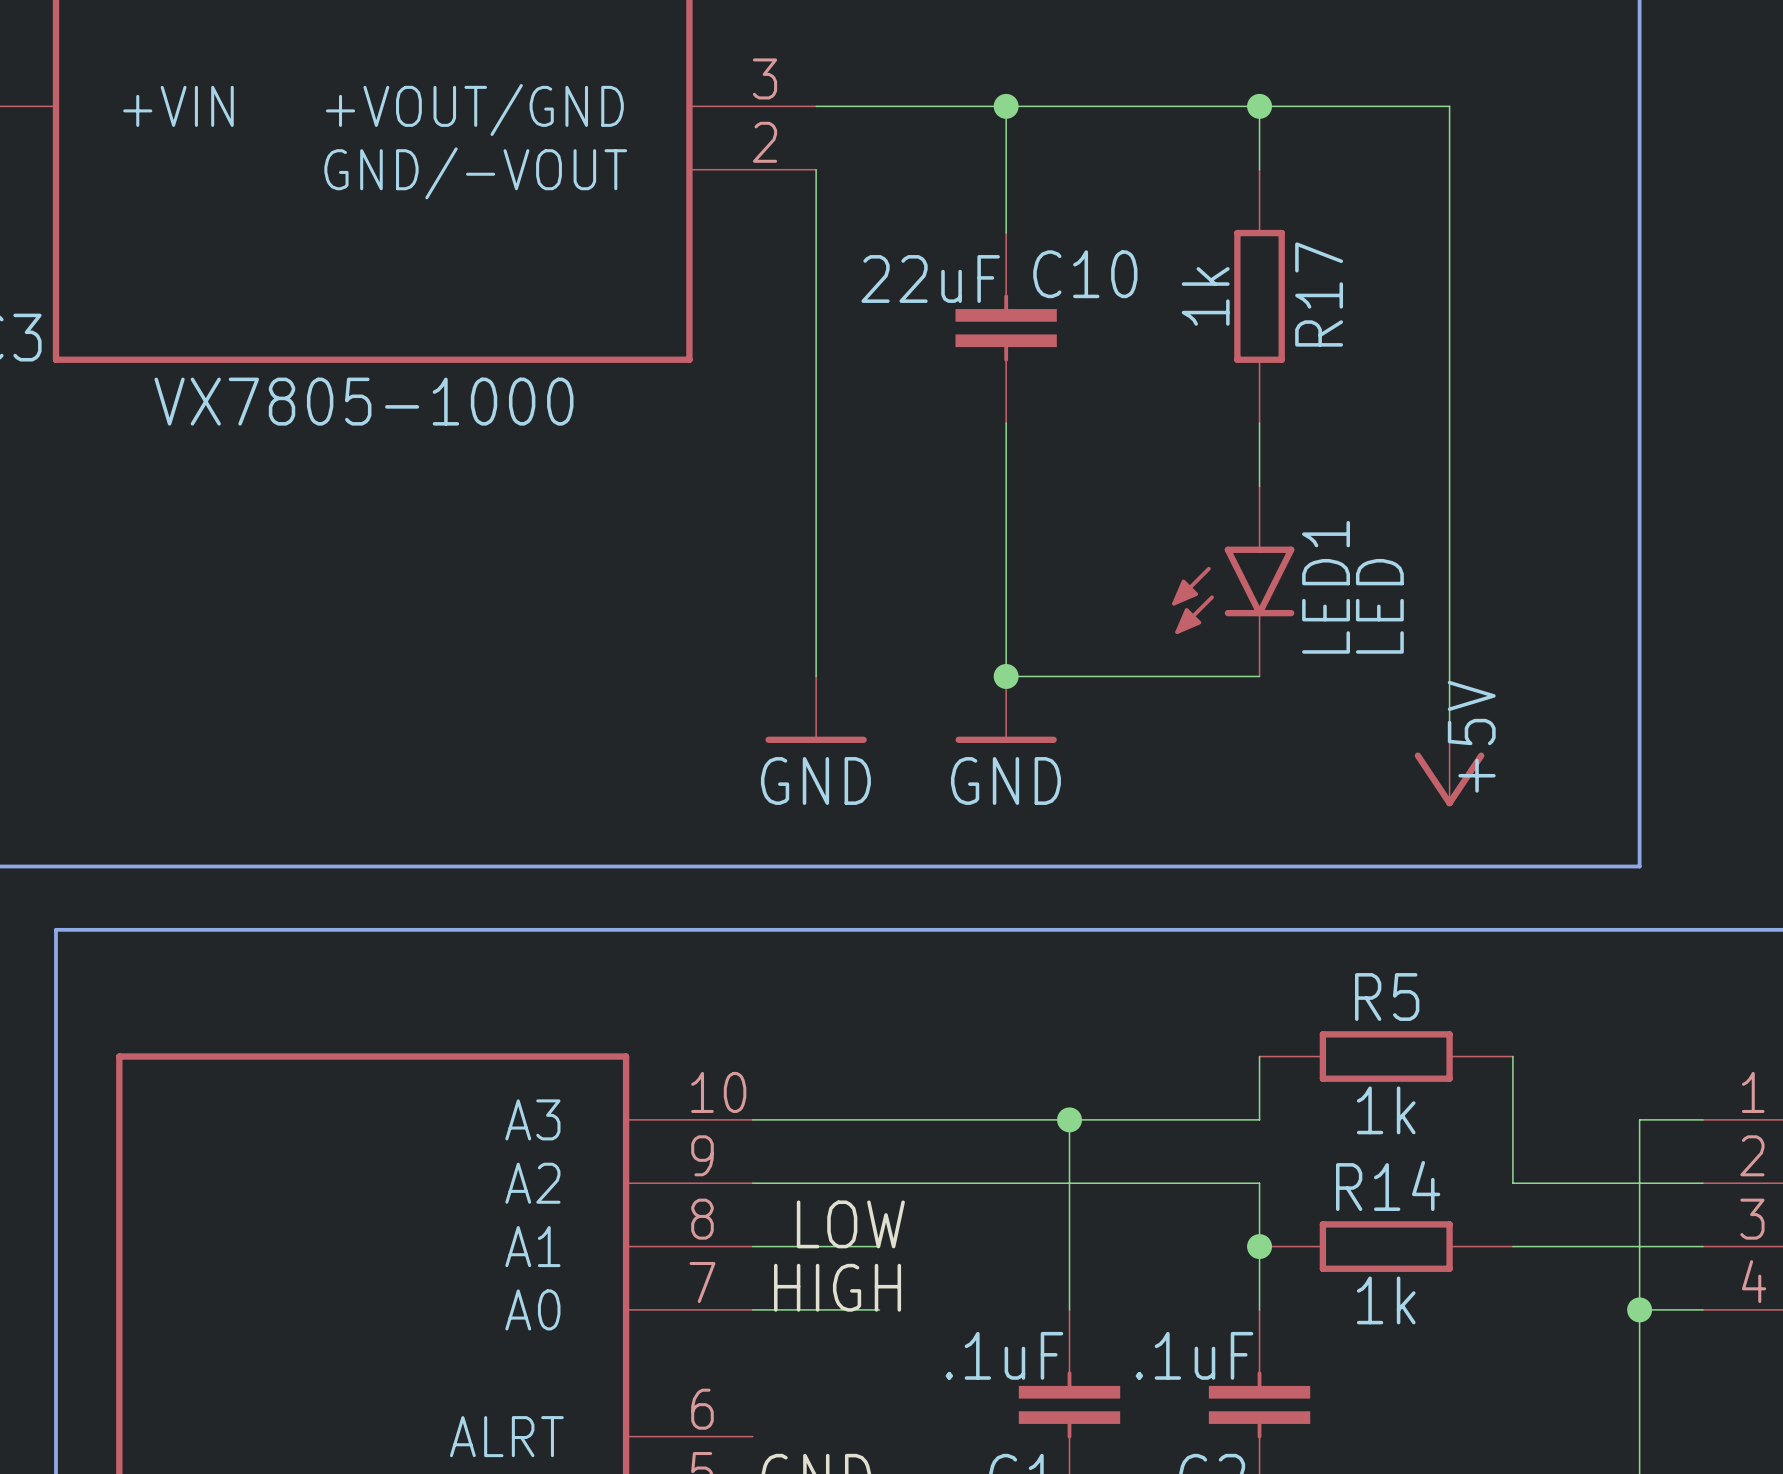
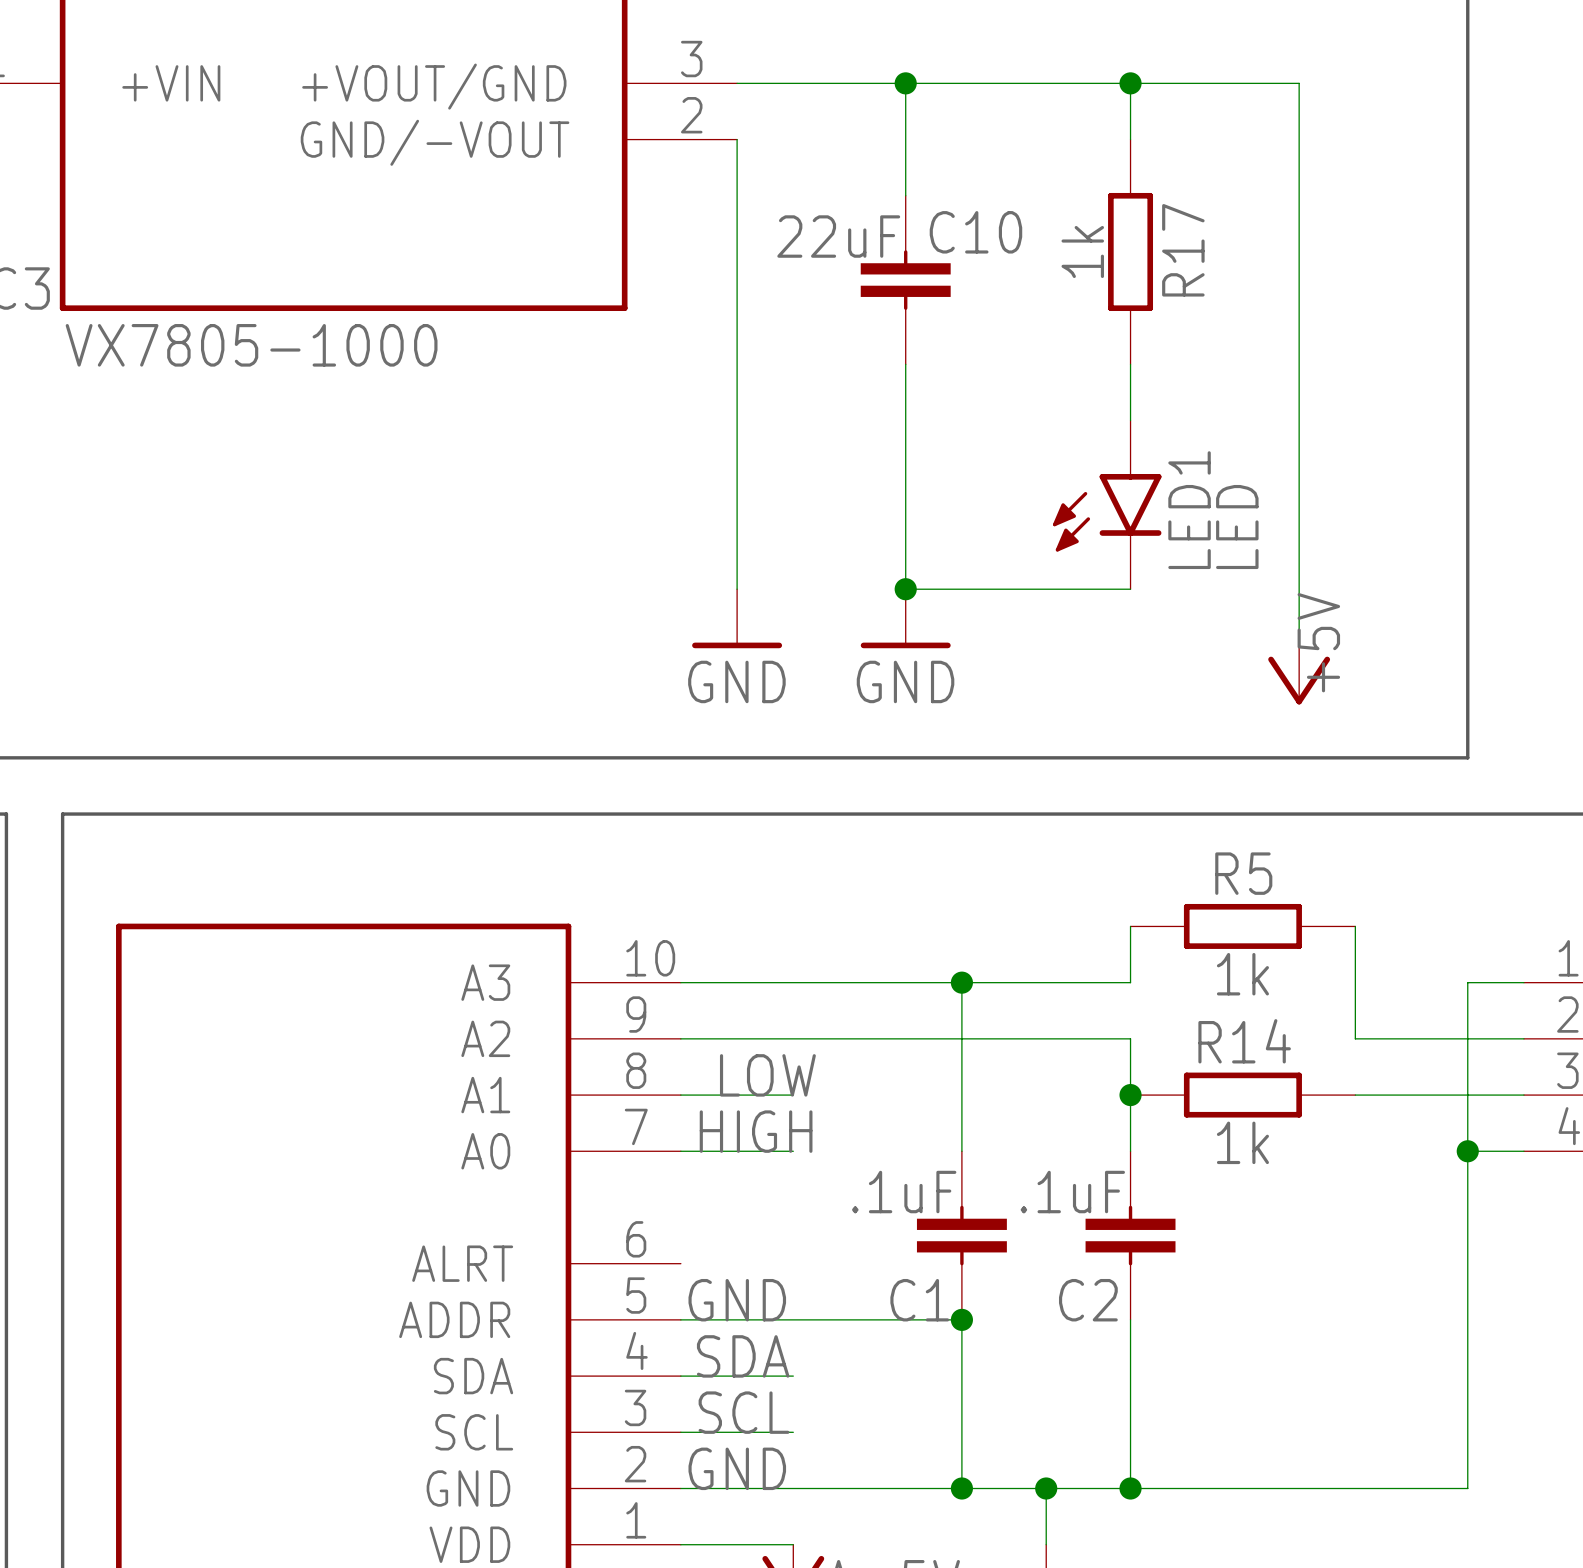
part value position: VX7805-1000 (363, 401) -> VX7805-1000 (251, 345)

